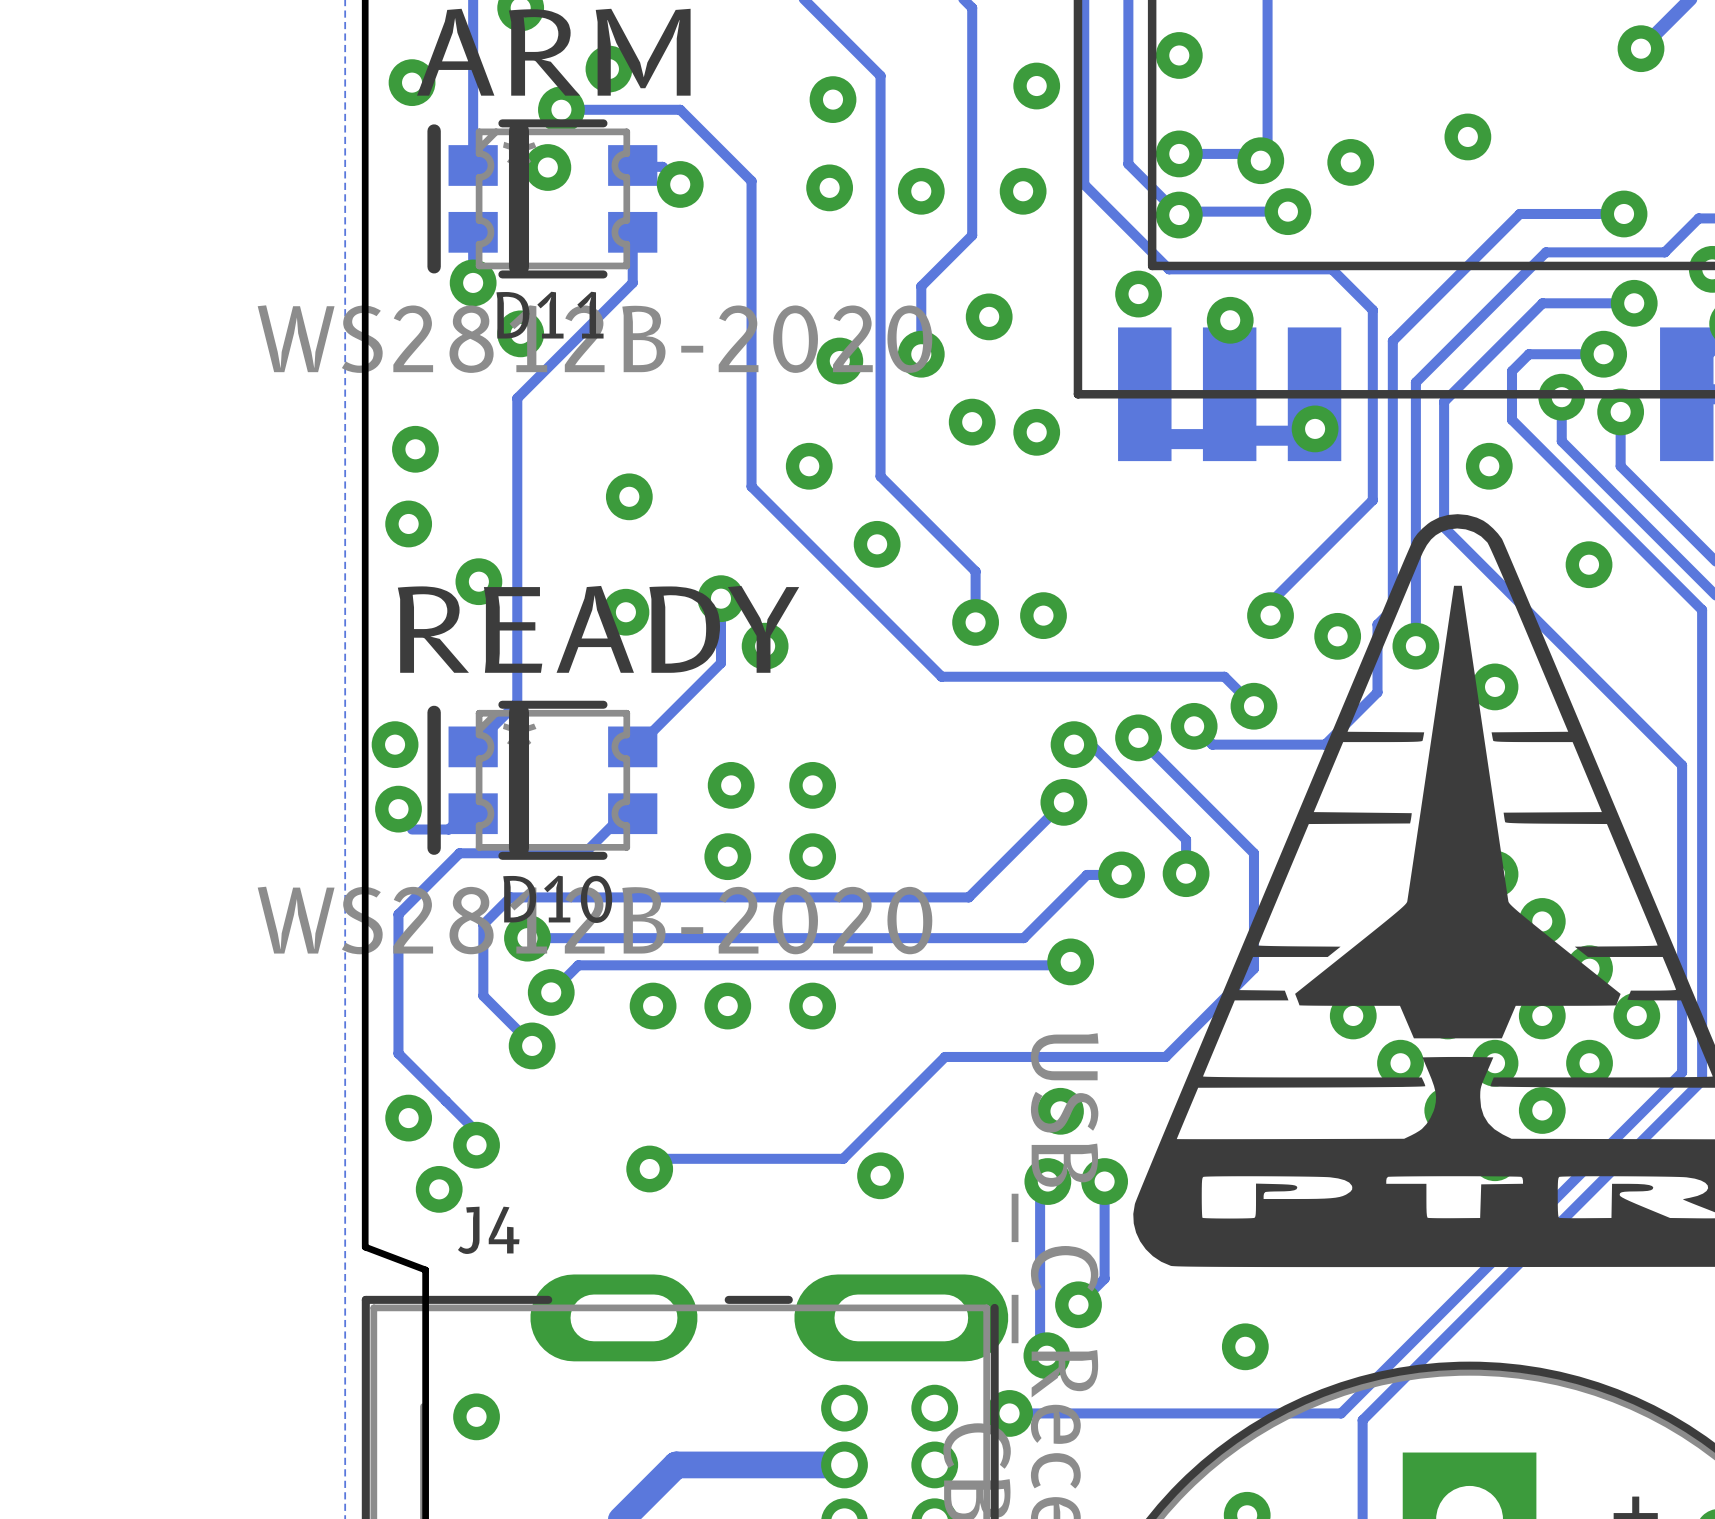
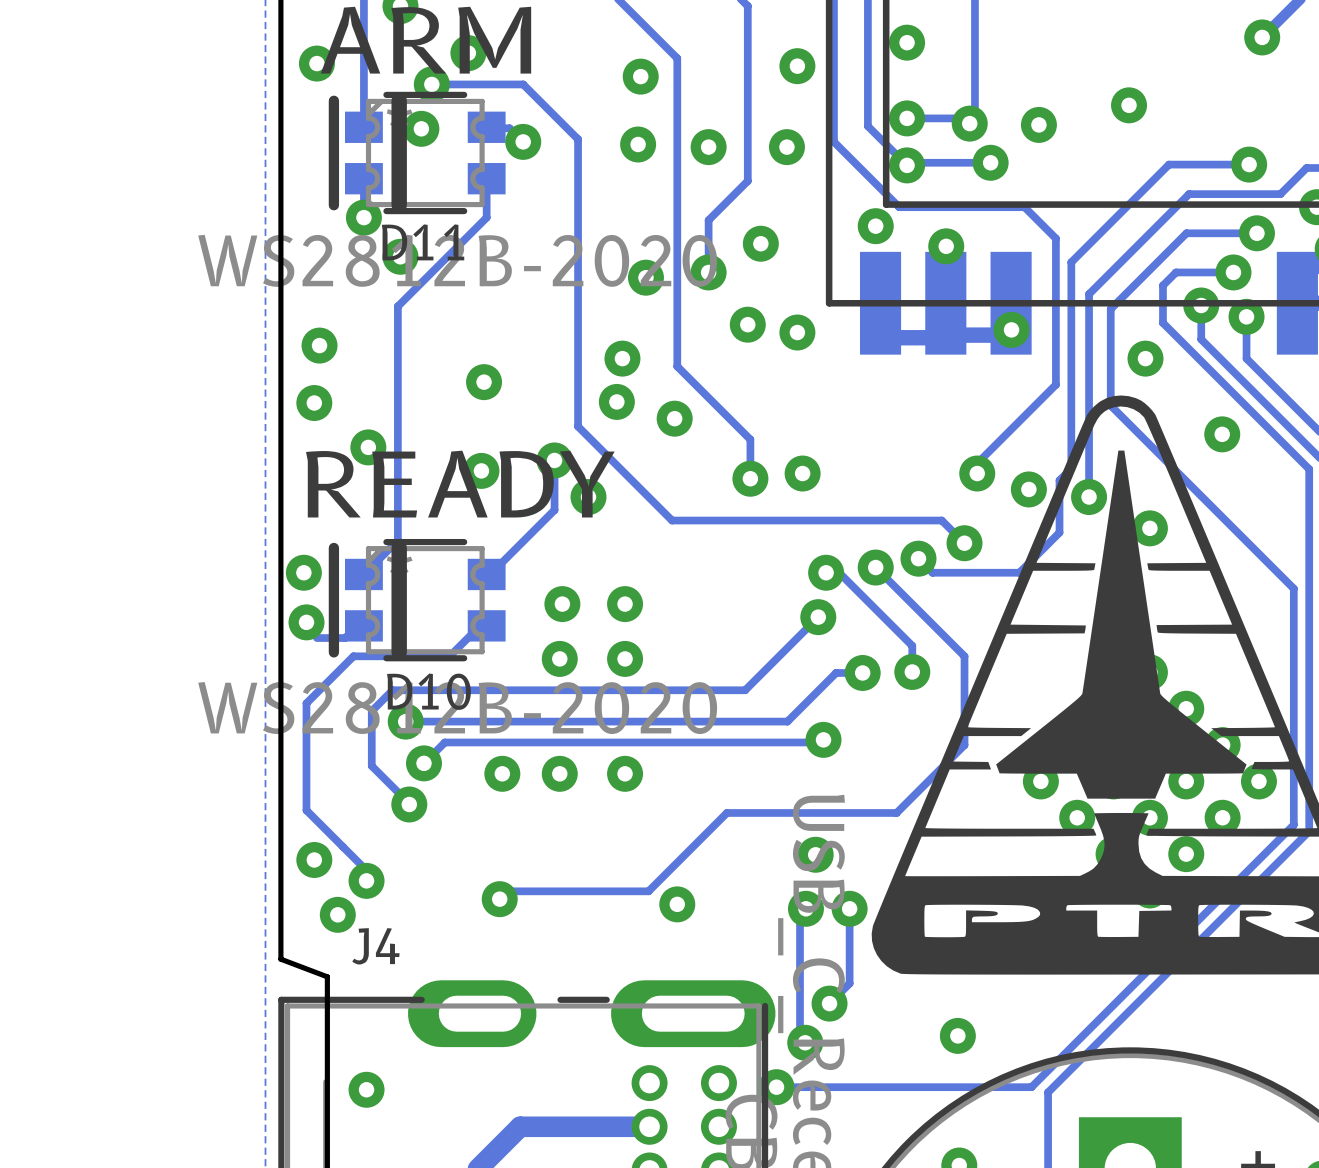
track: (751, 486) (941, 676) -> (578, 374) (578, 426) (672, 520) (724, 520)
via: none -> (616, 401)

